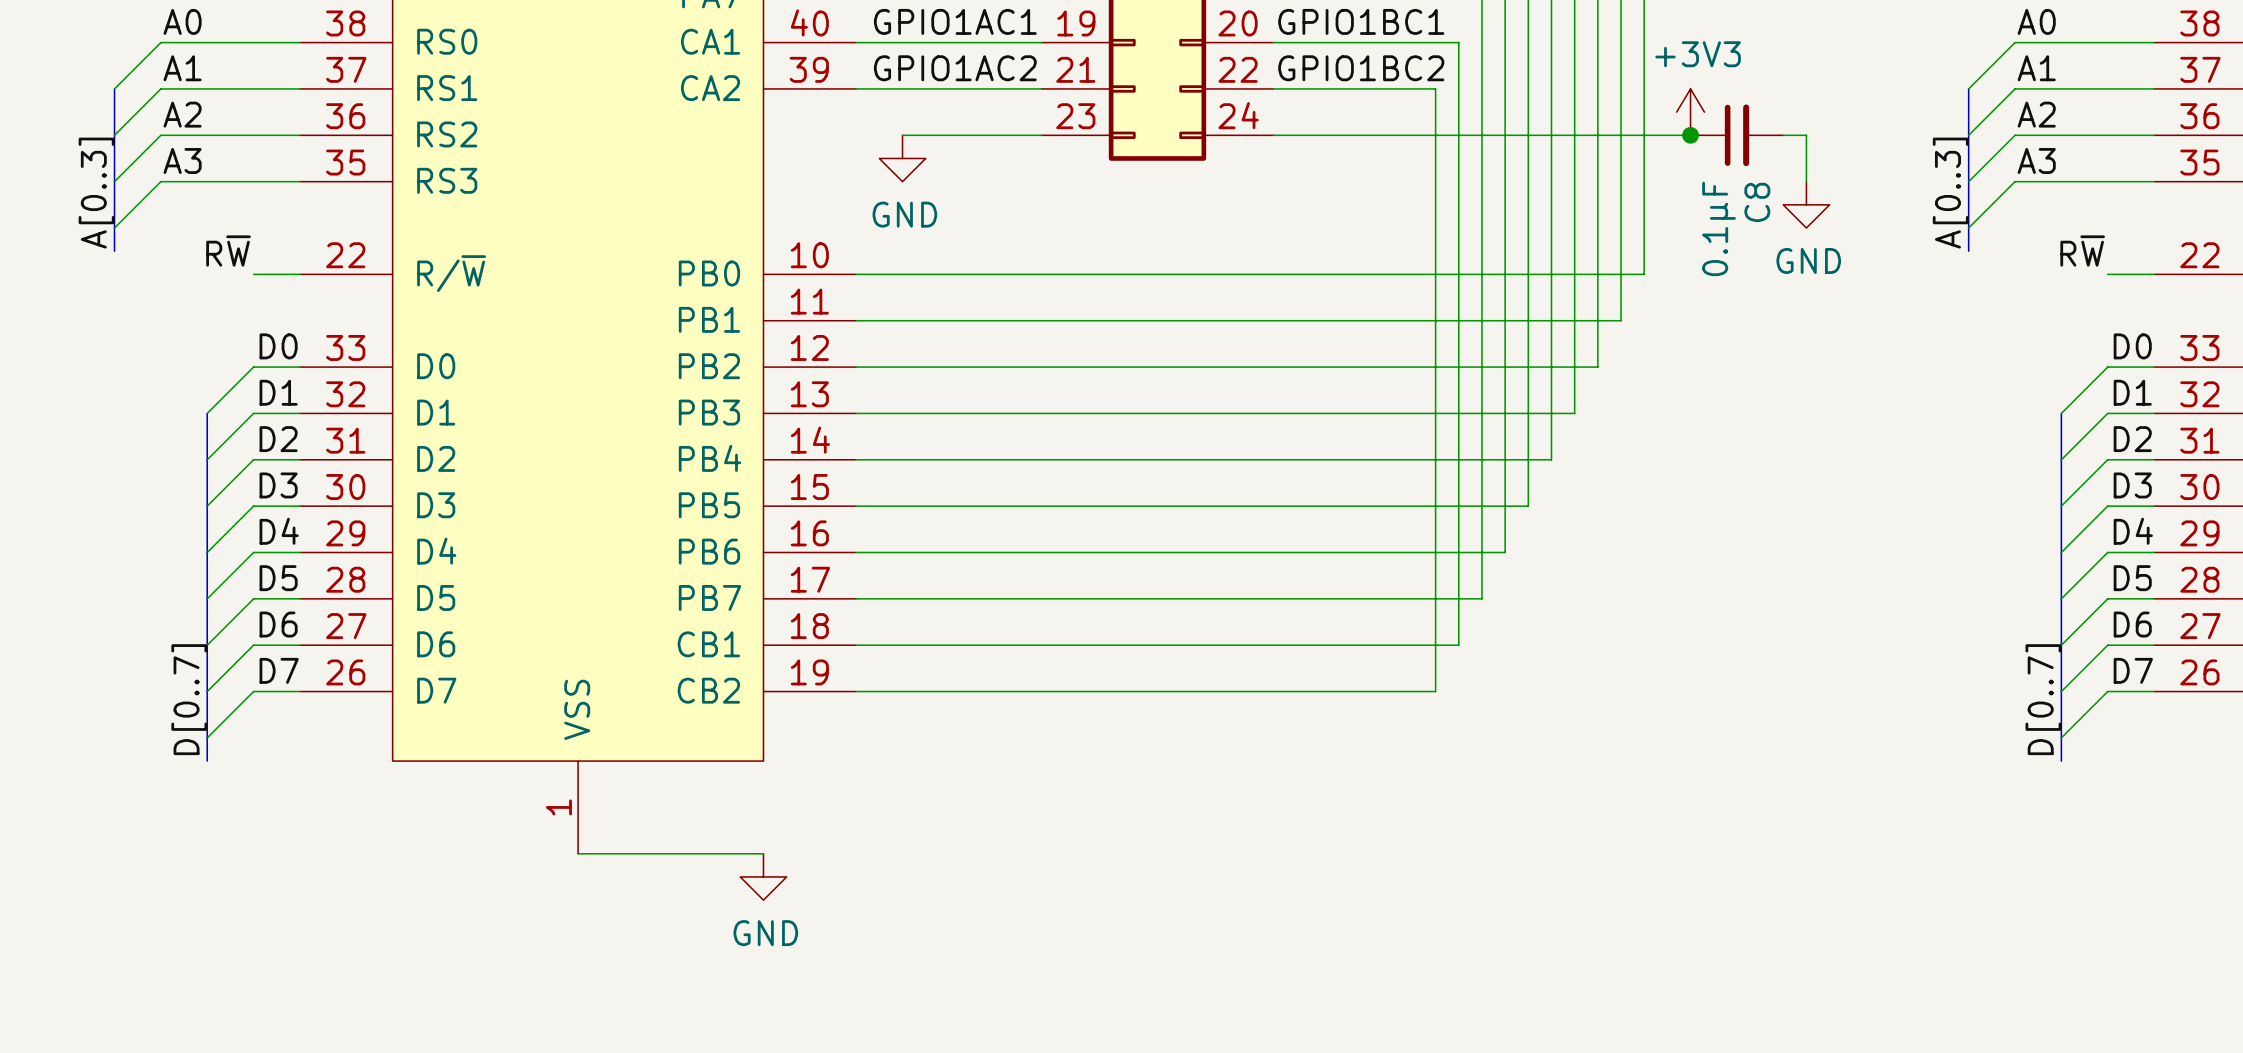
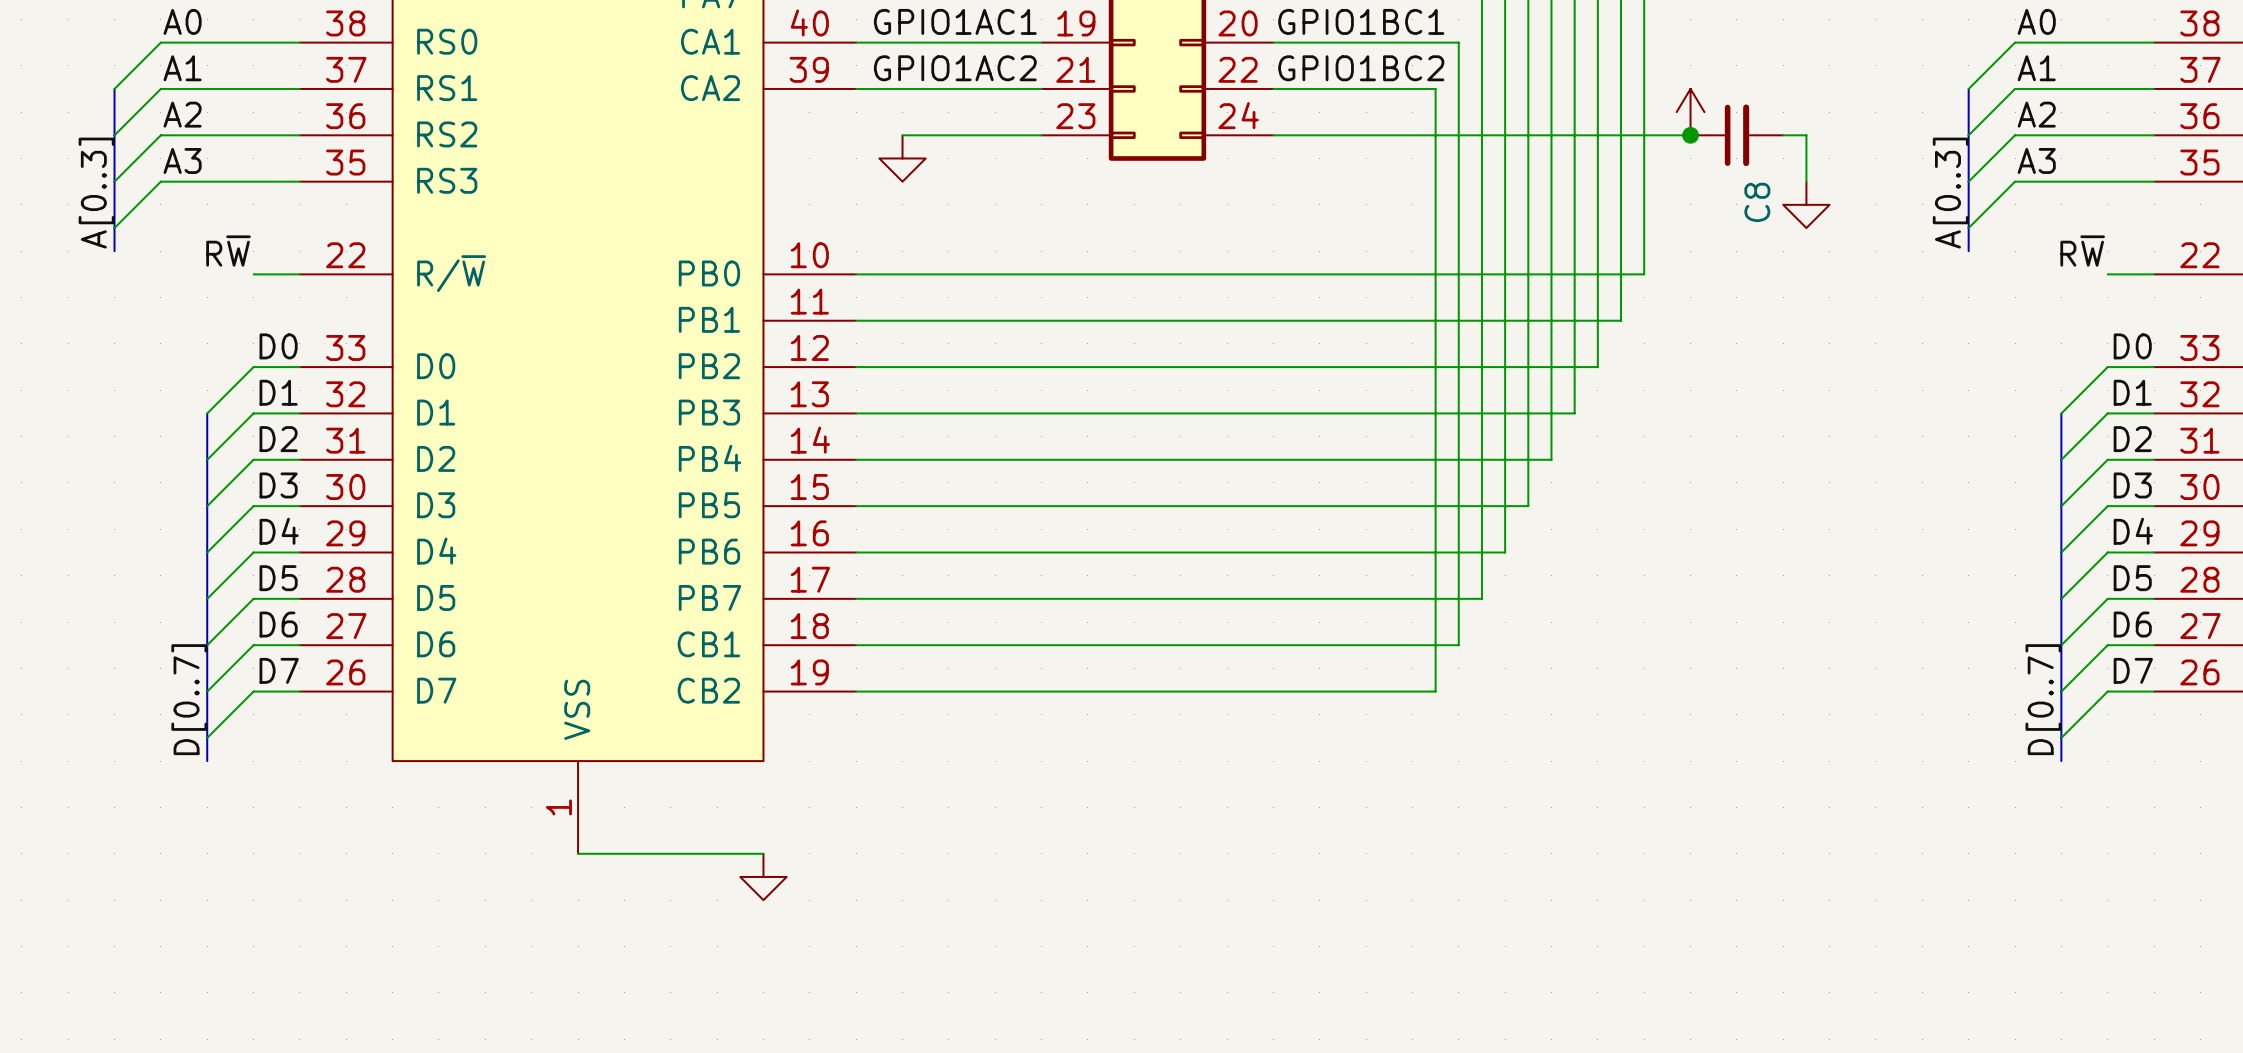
power symbol text: +3V3 (1698, 54) -> none
power symbol text: GND (904, 214) -> none
C8 value: 0.1μF (1719, 228) -> none
power symbol text: GND (1808, 260) -> none
power symbol text: GND (765, 933) -> none

